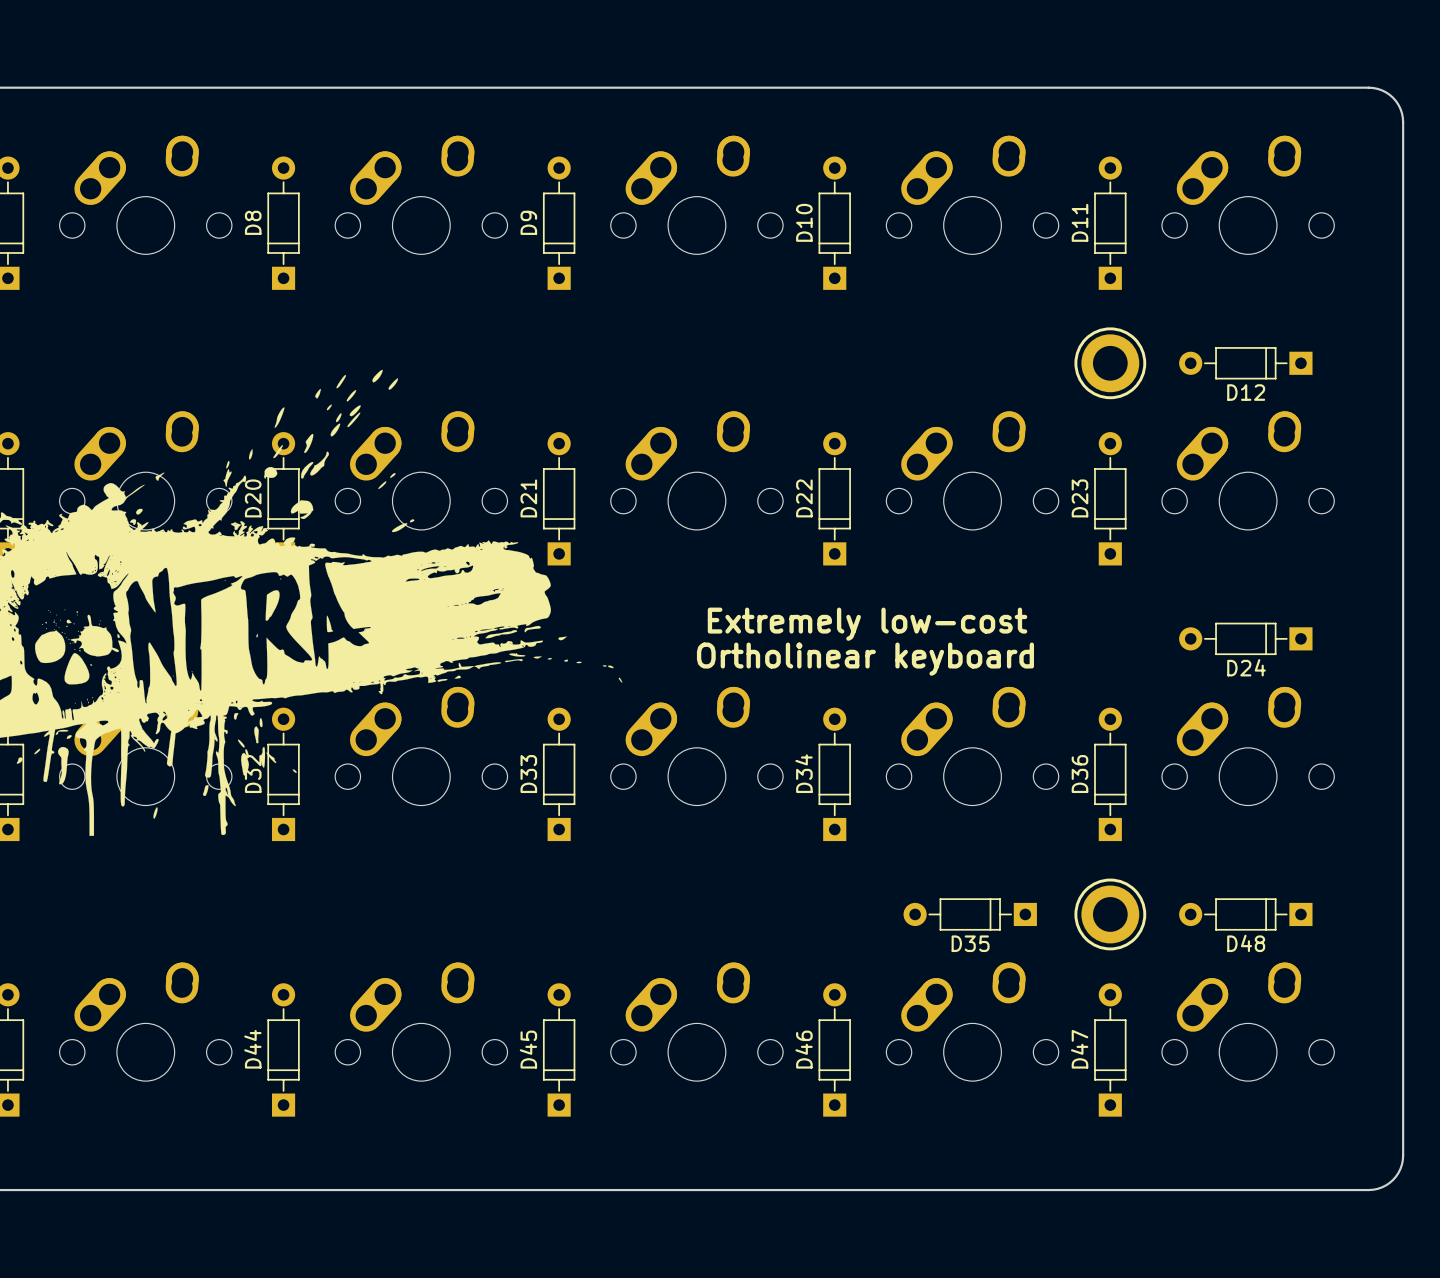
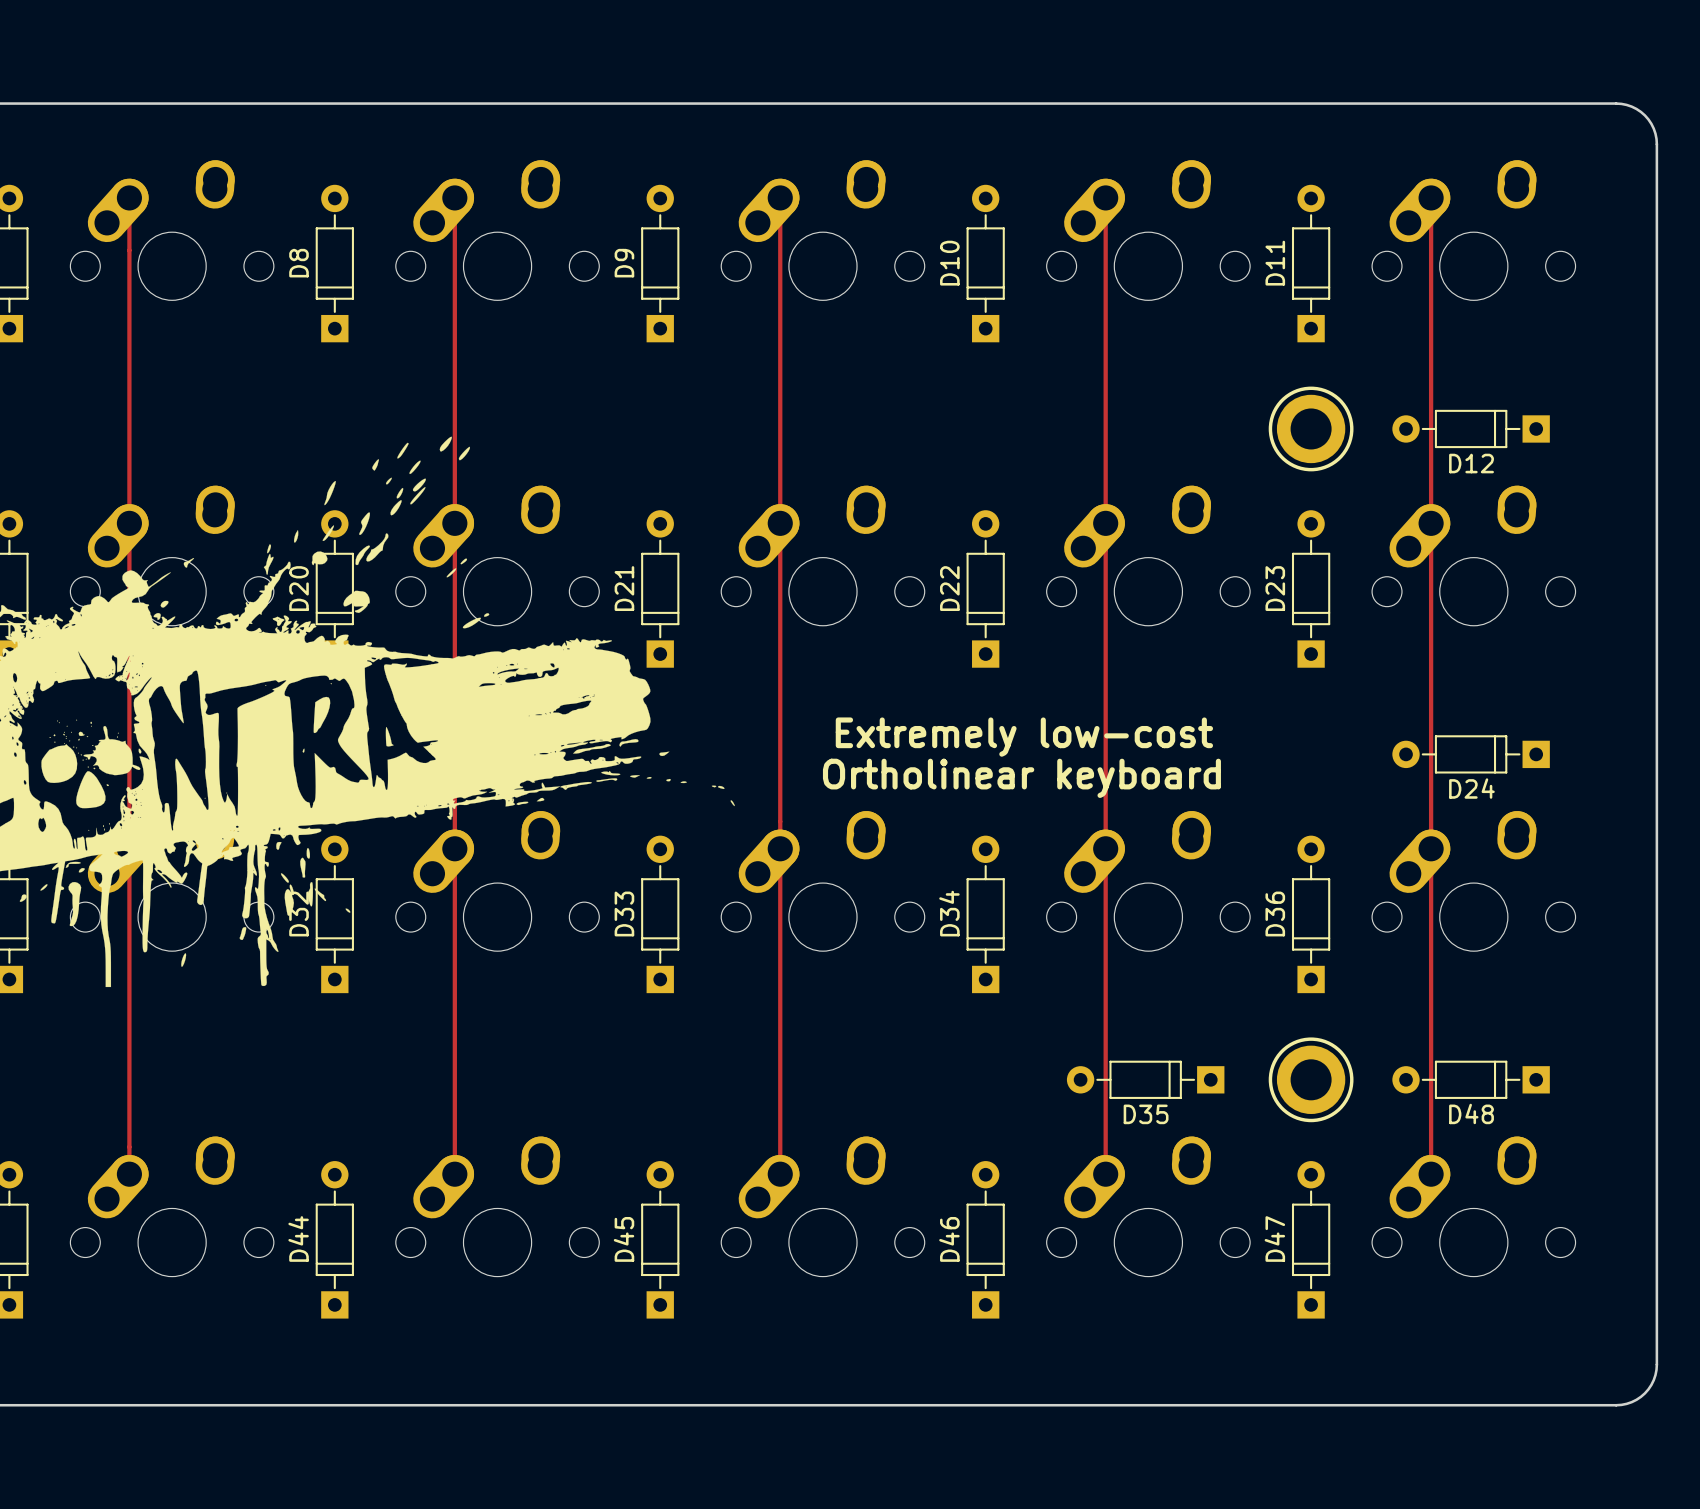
track: none -> (129, 197) (129, 1174)
track: none -> (454, 197) (454, 1174)
track: none -> (780, 197) (780, 1174)
track: none -> (1105, 197) (1105, 1176) (1083, 1199)
track: none -> (1431, 197) (1431, 1174)

